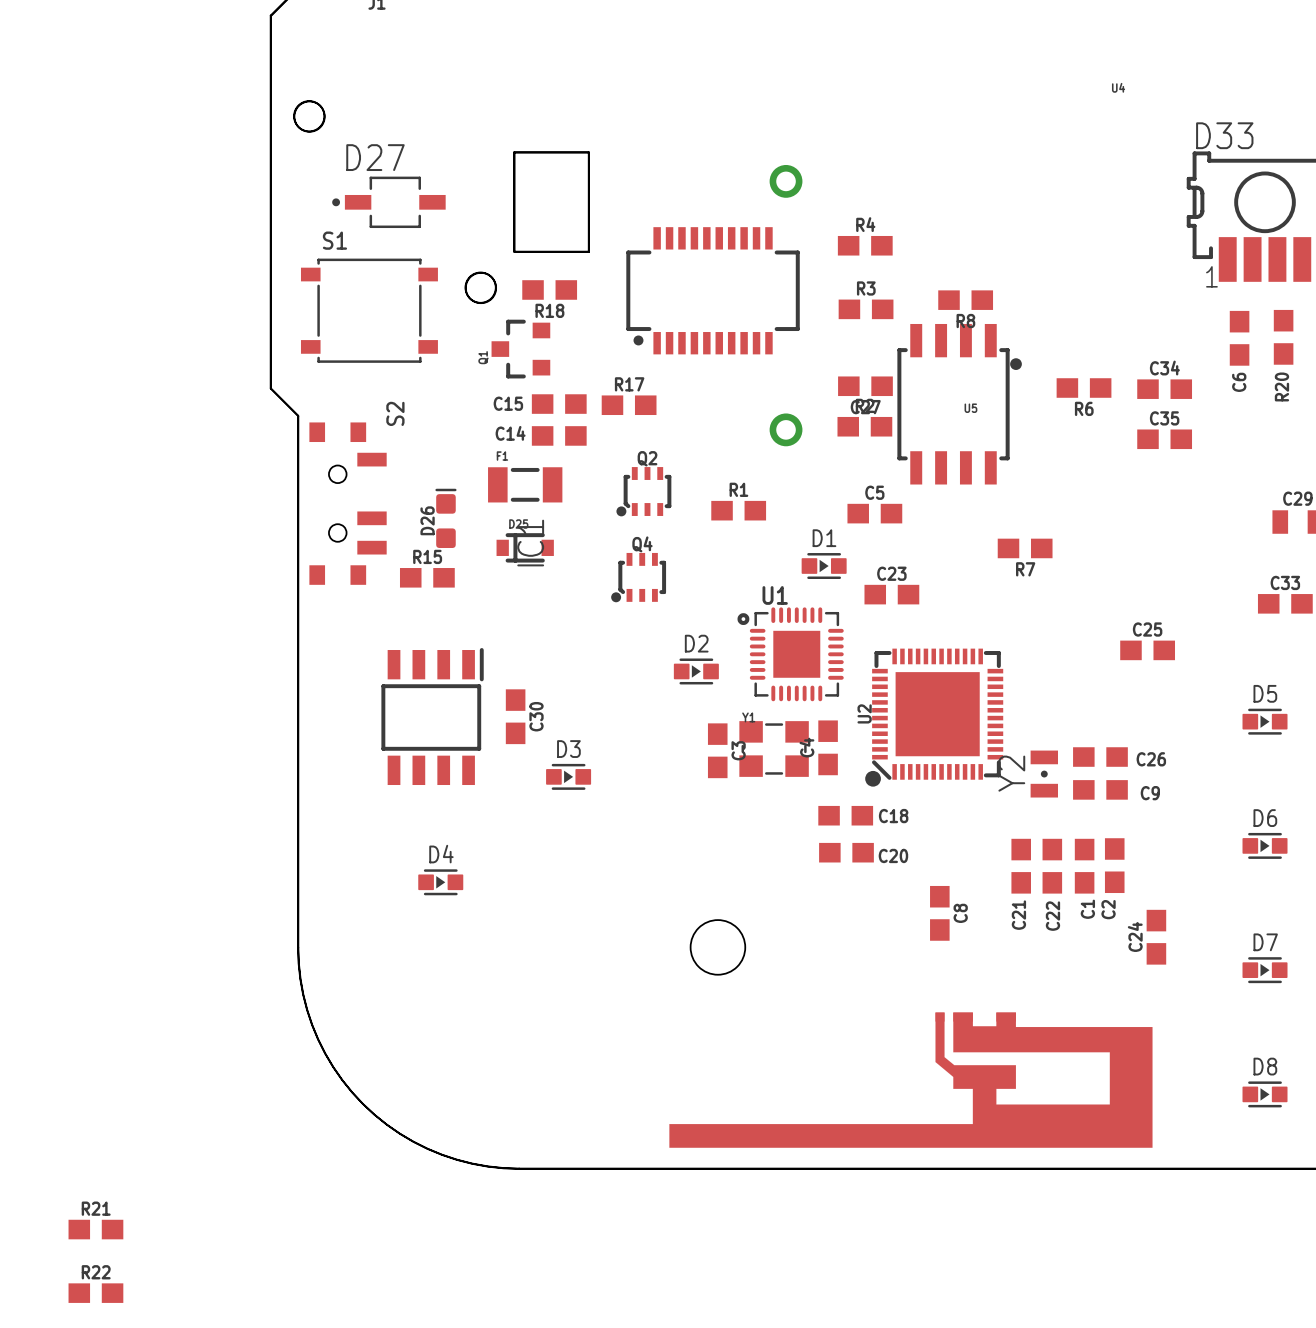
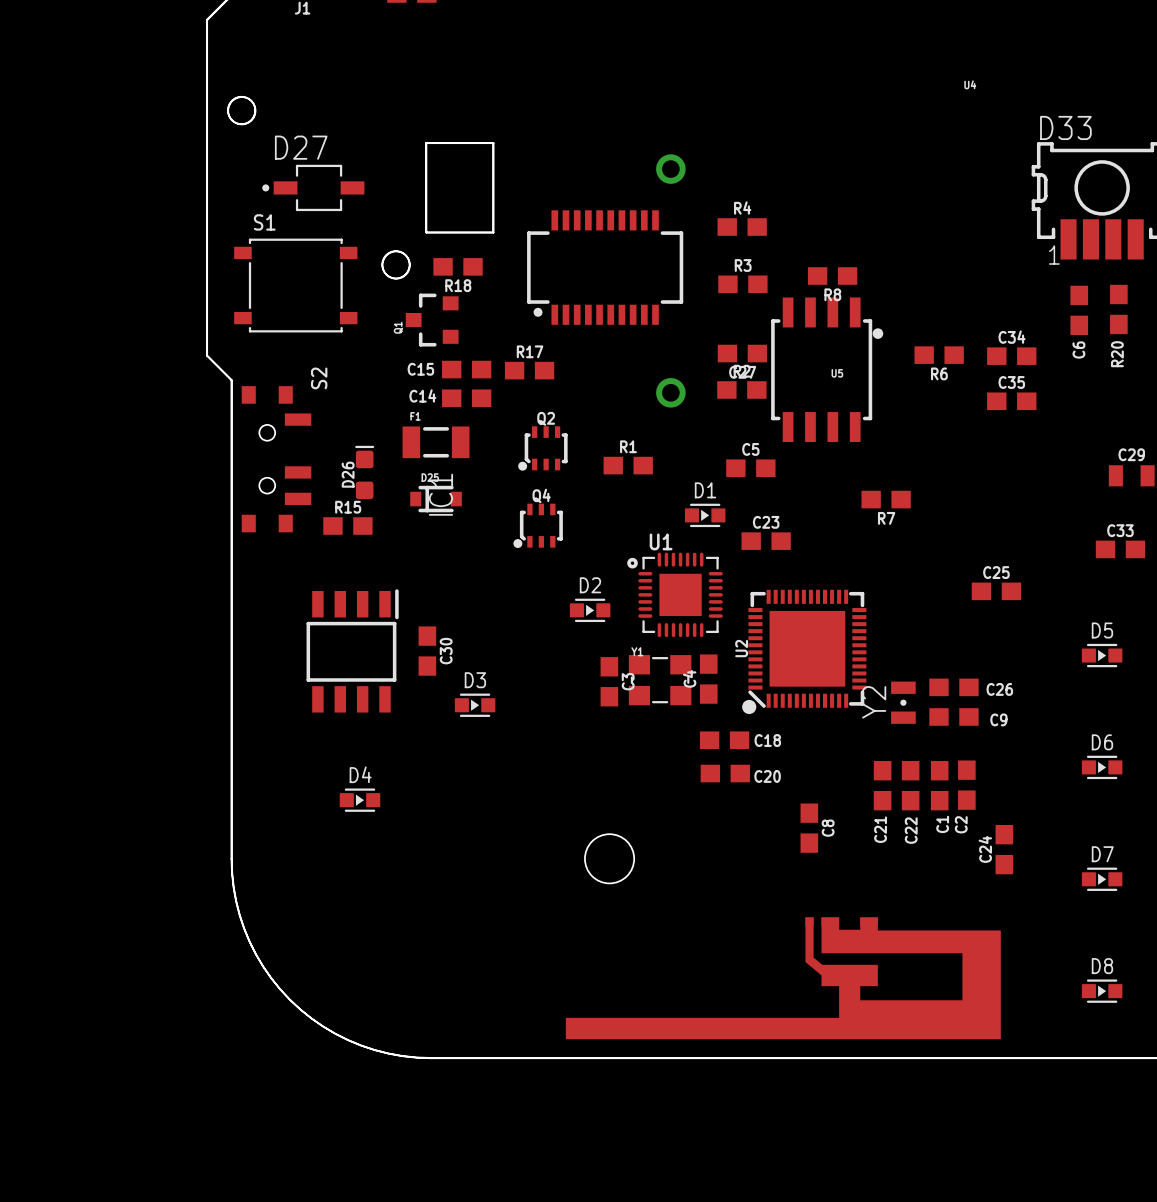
R21: (95, 1229) -> none
R22: (95, 1293) -> none

